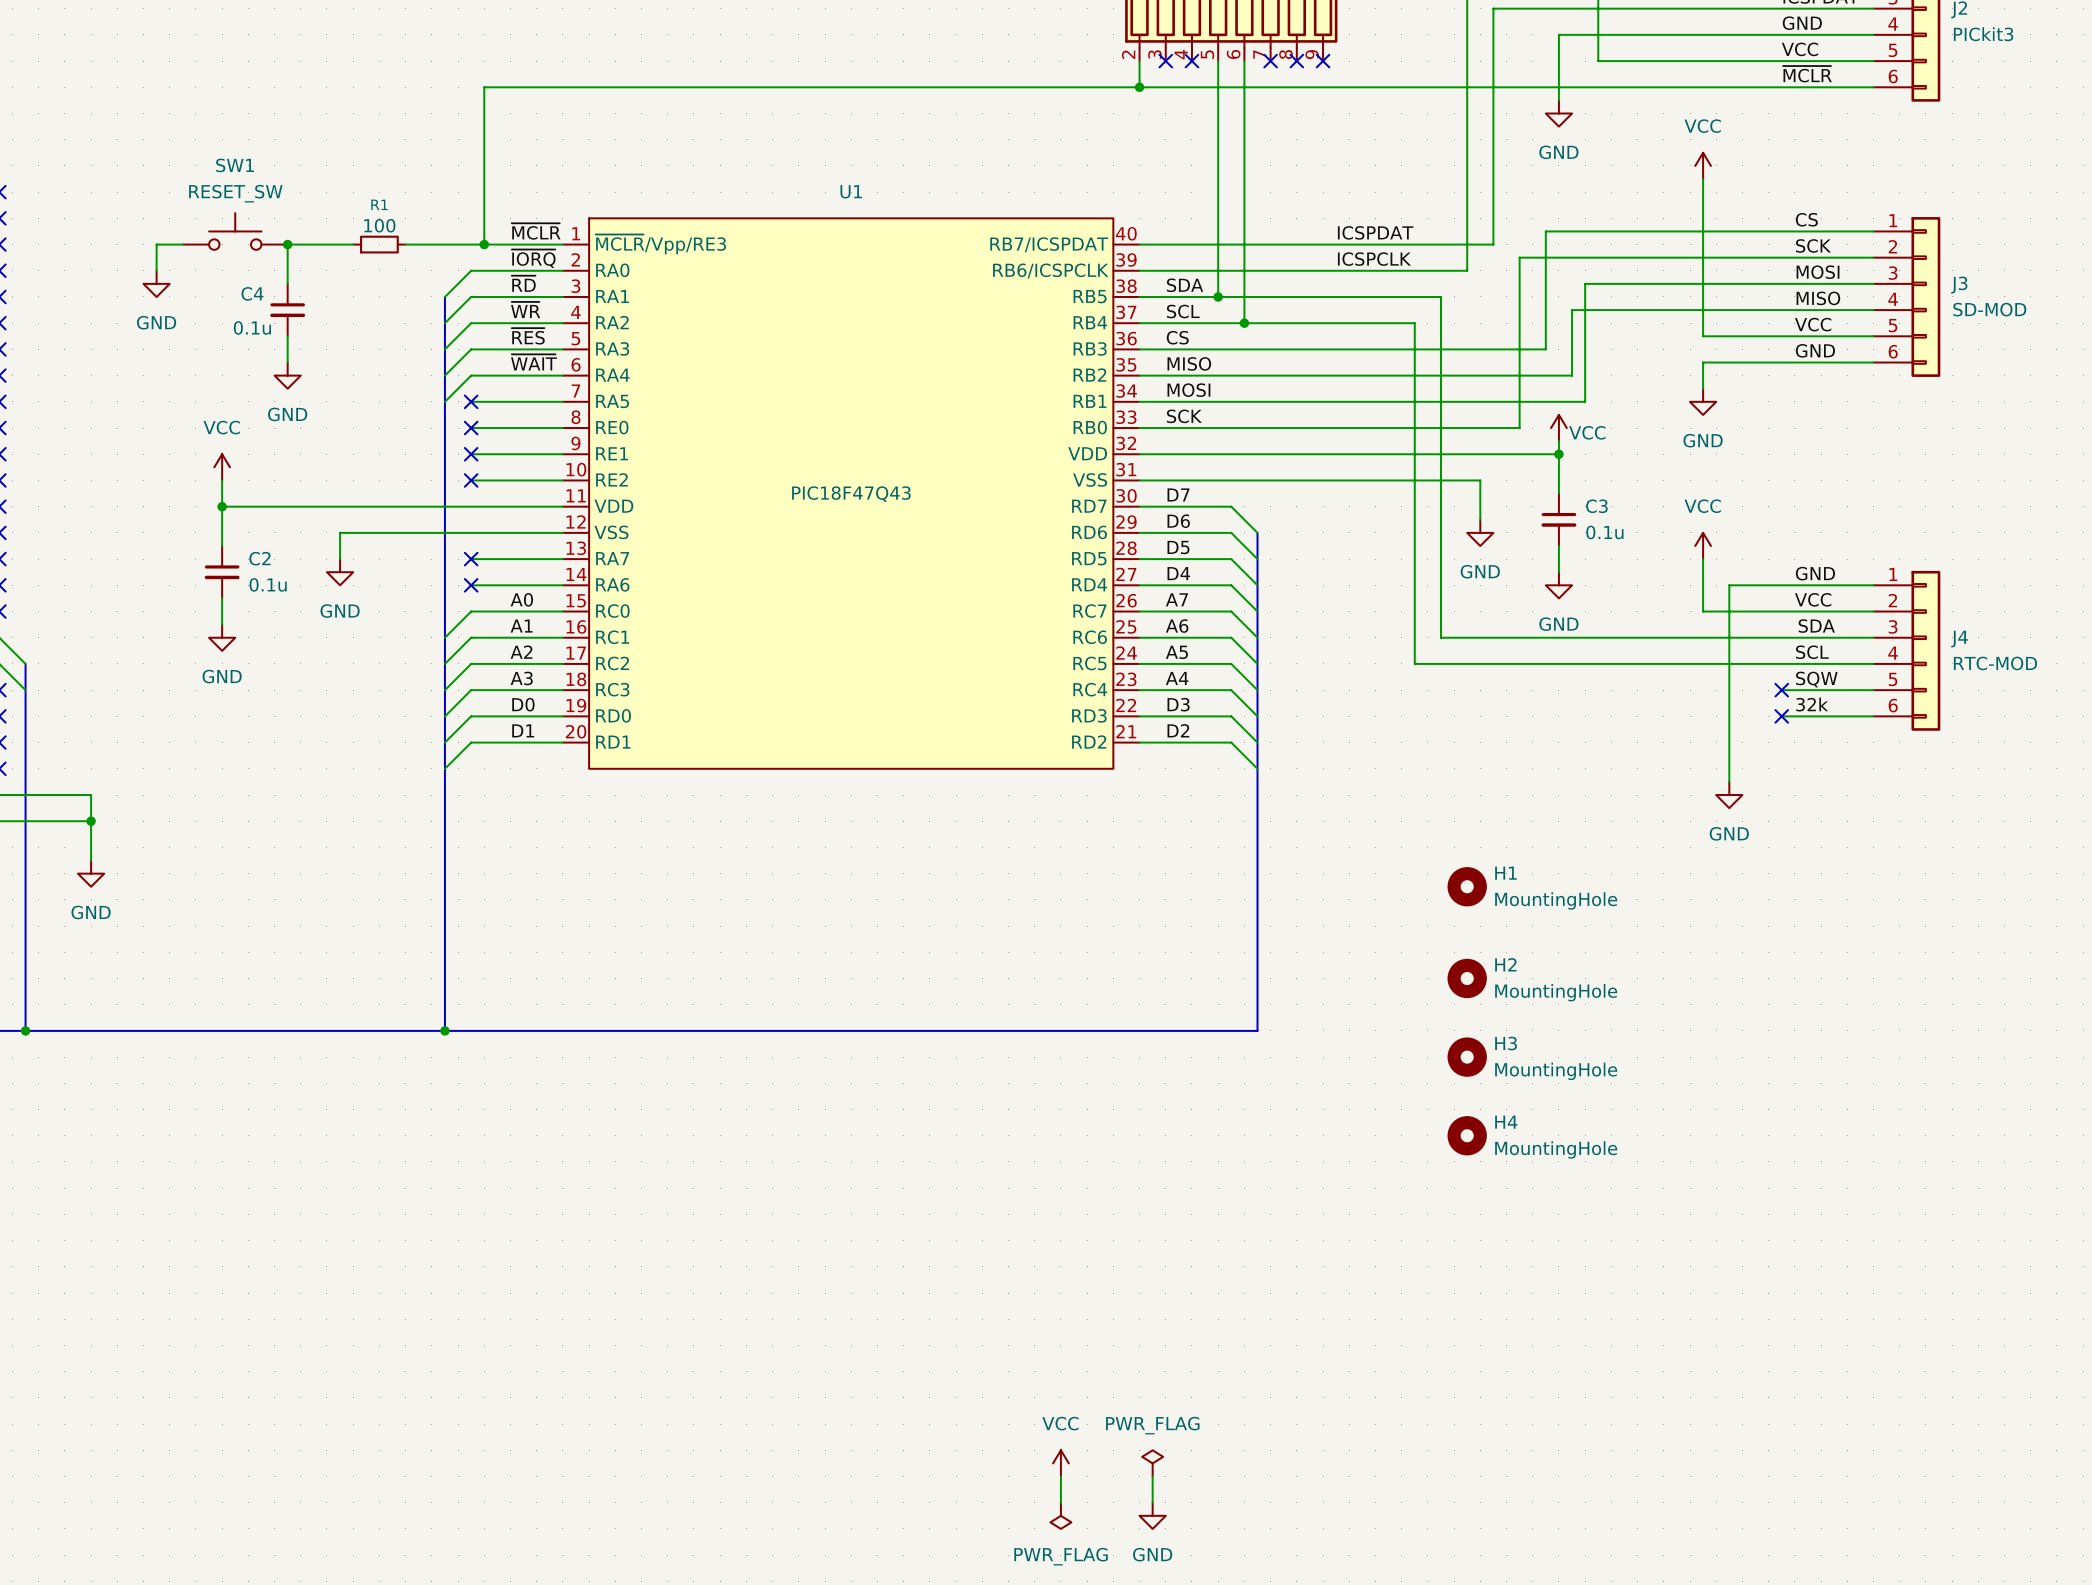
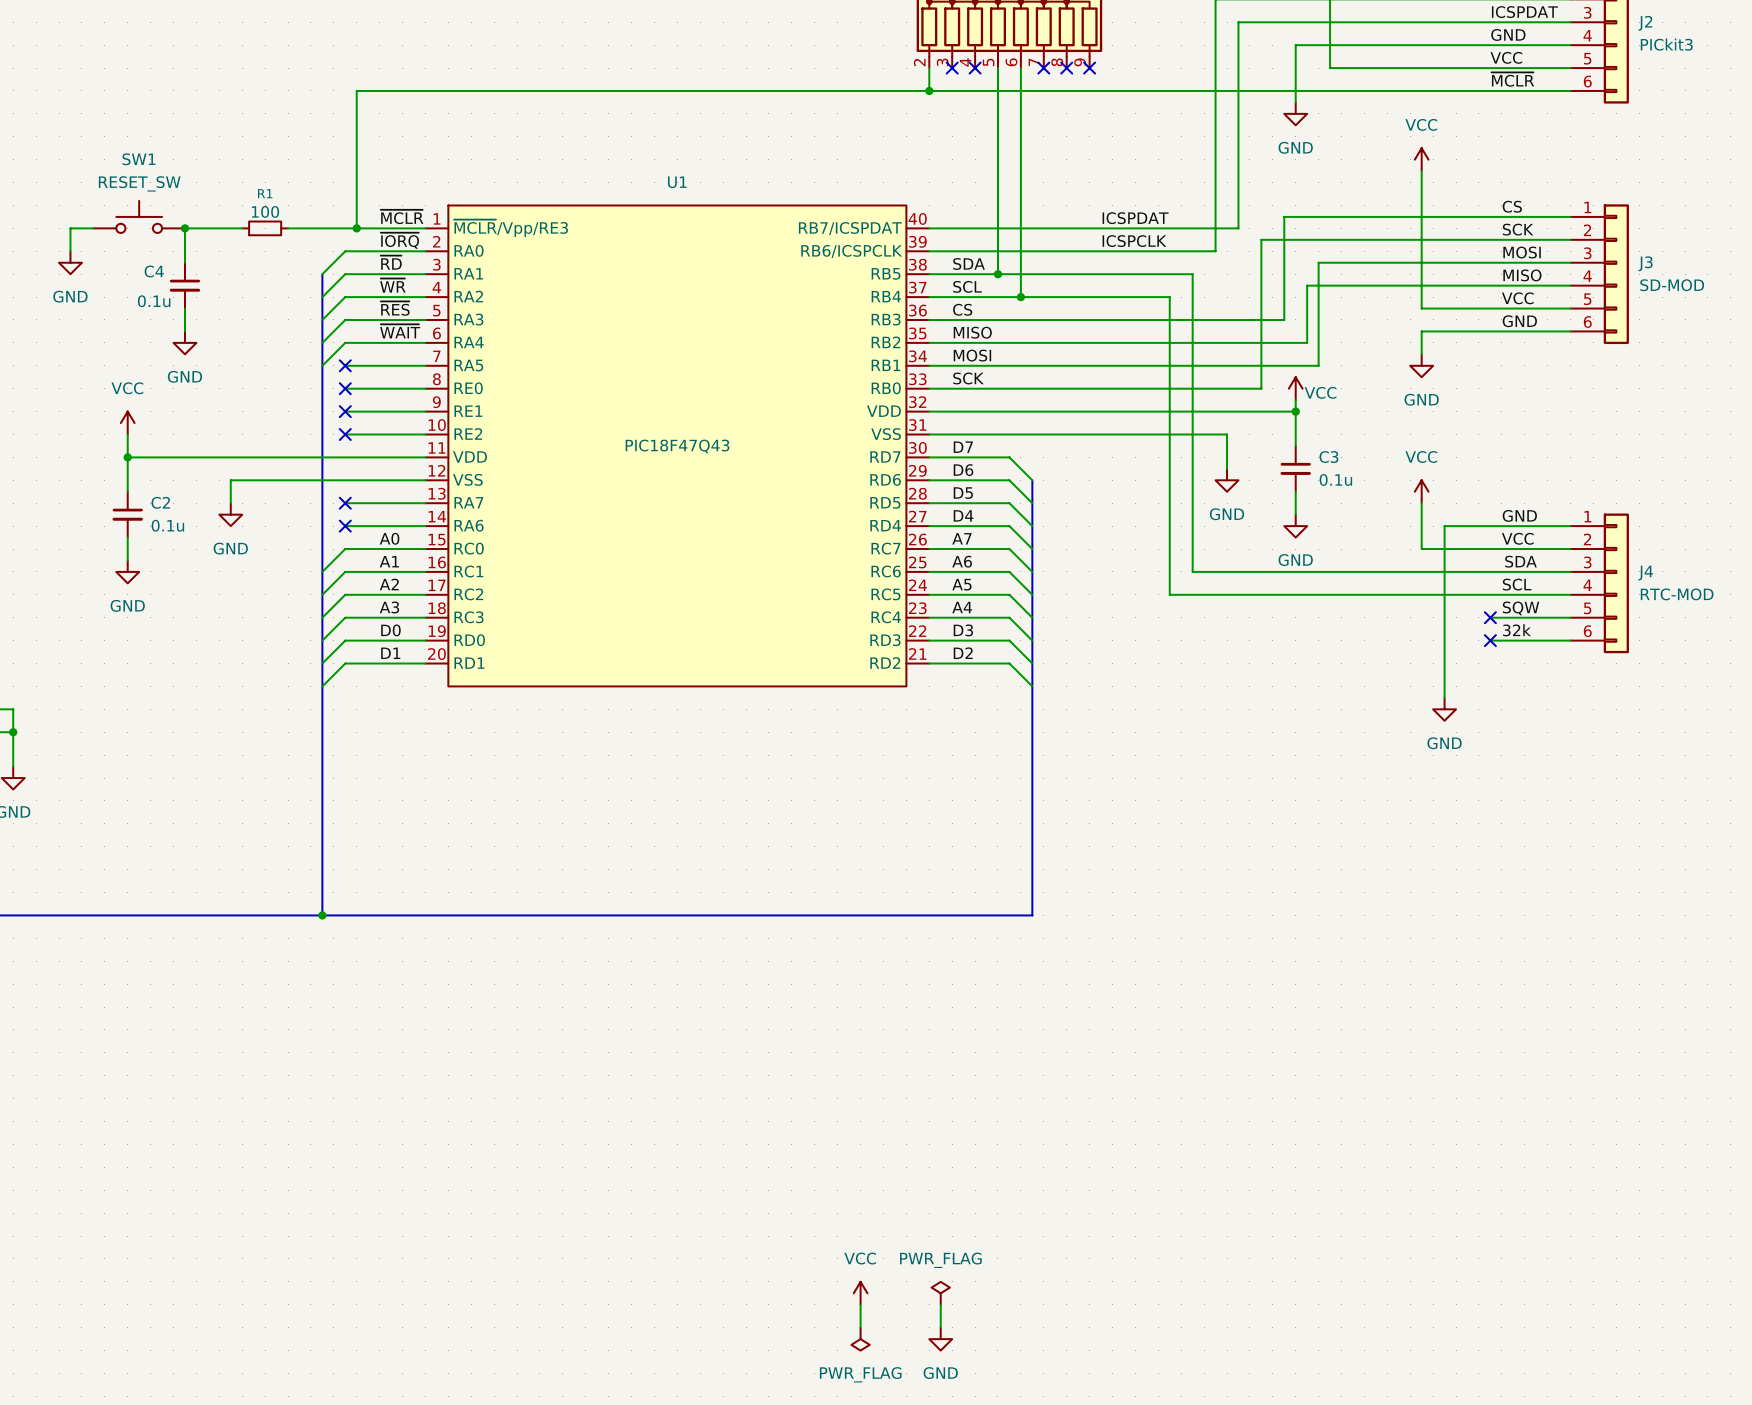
H1: MountingHole (1467, 886) -> none
H2: MountingHole (1467, 978) -> none
H3: MountingHole (1467, 1057) -> none
H4: MountingHole (1467, 1135) -> none

